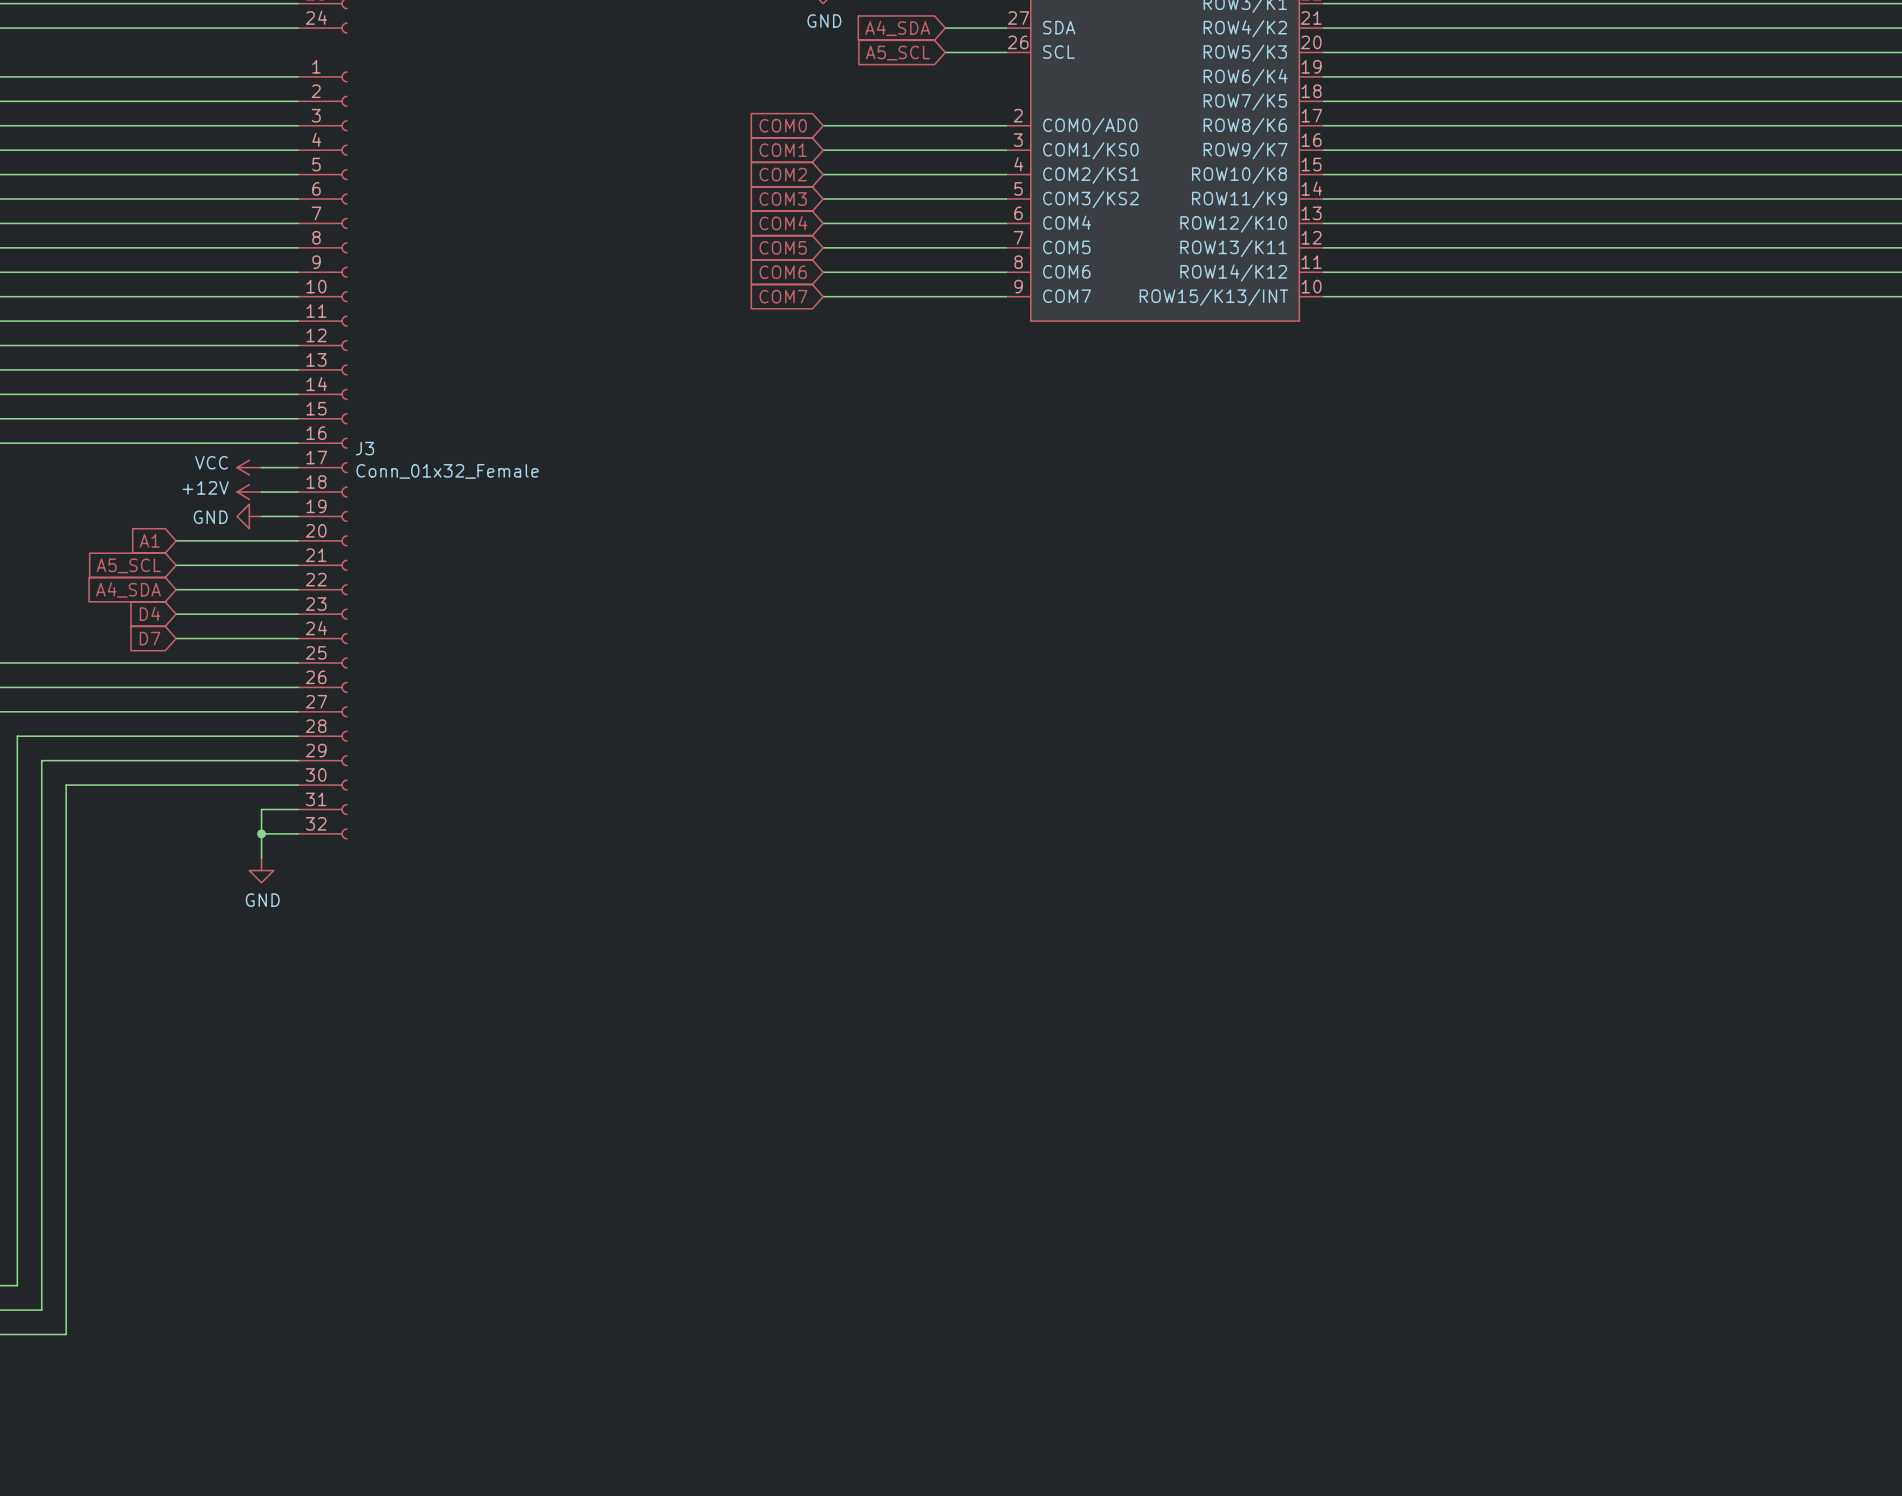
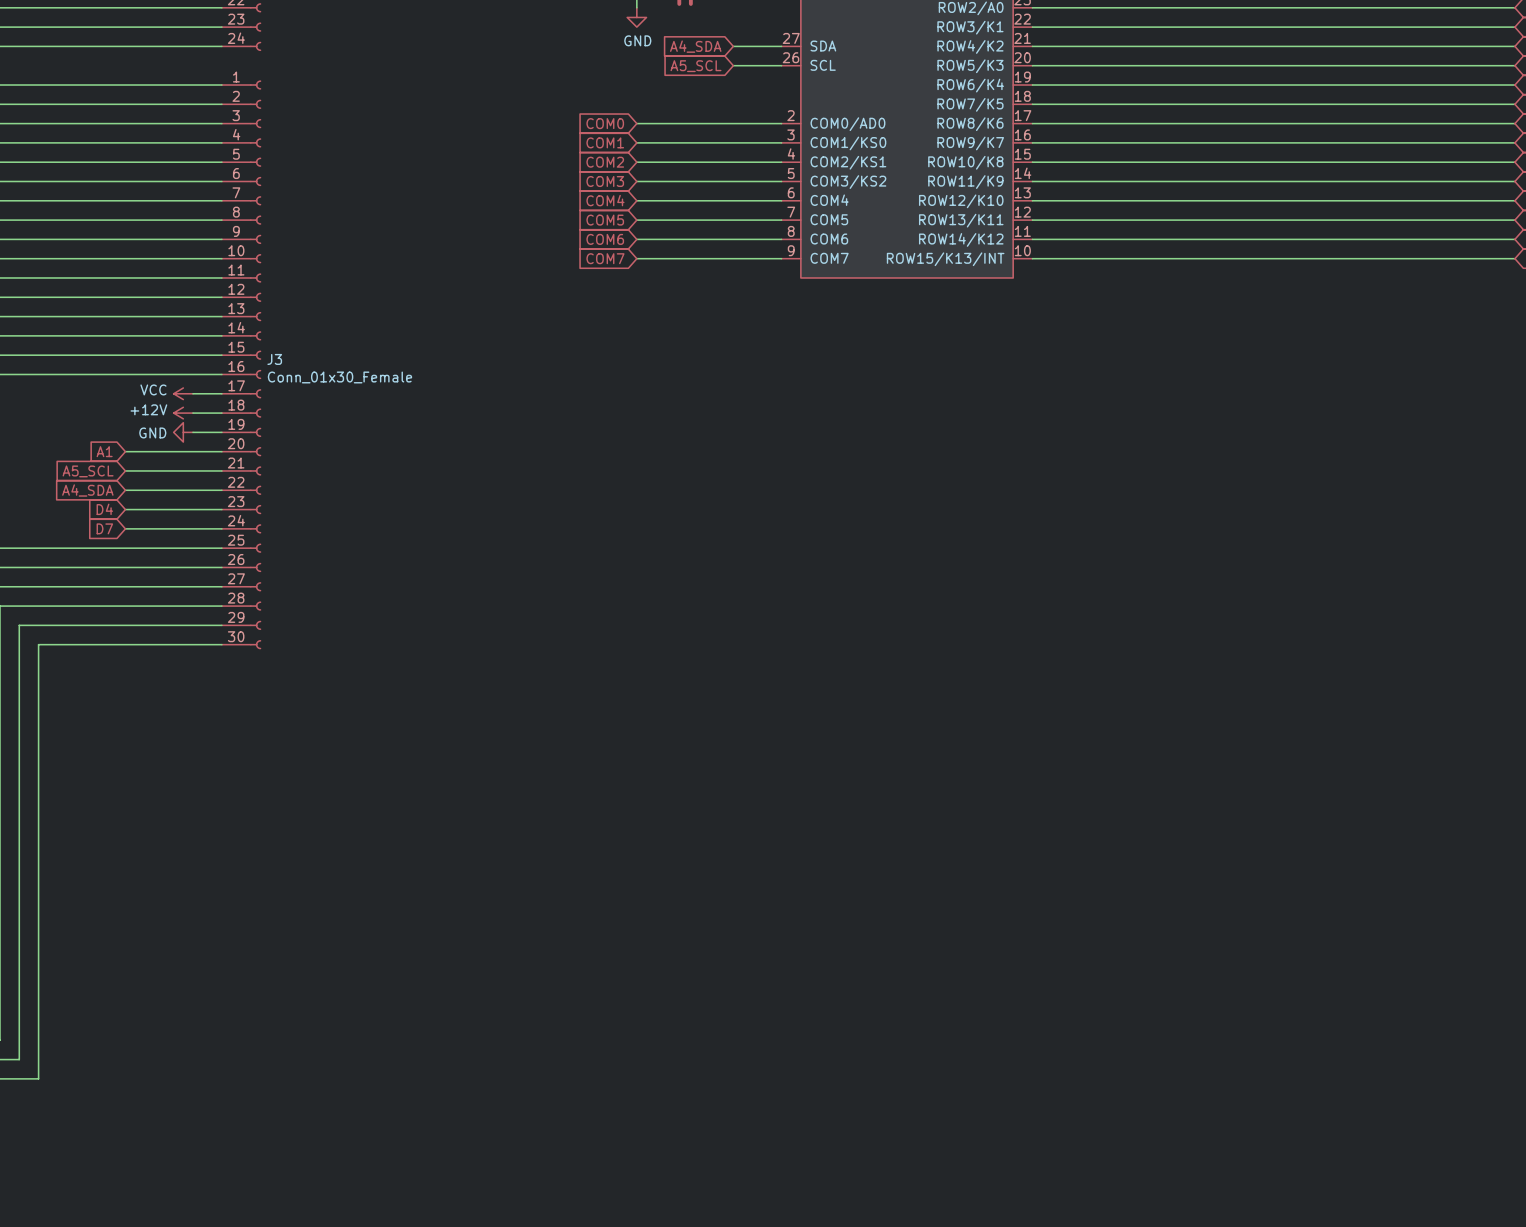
J3 symbol: [298, 71, 348, 840] -> [221, 80, 262, 650]
J3 value: Conn_01x32_Female (447, 471) -> Conn_01x30_Female (339, 377)
wire: (298, 809) (261, 809) (261, 858) -> none
wire: (261, 833) (298, 833) -> none
junction: (261, 833) -> none
power symbol: GND (261, 870) -> none

